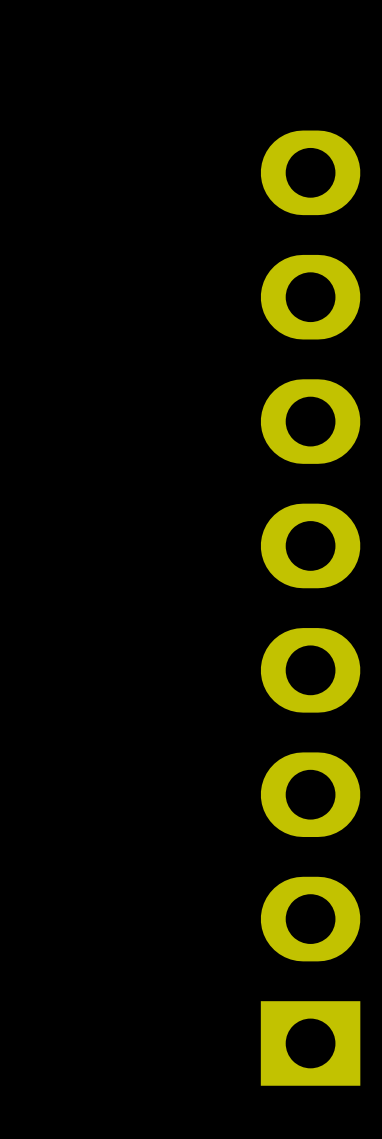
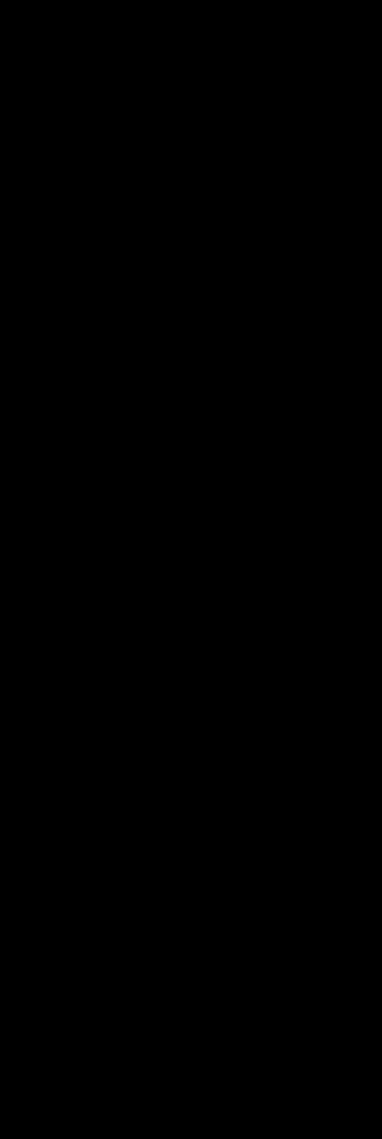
part: (310, 608) -> none

